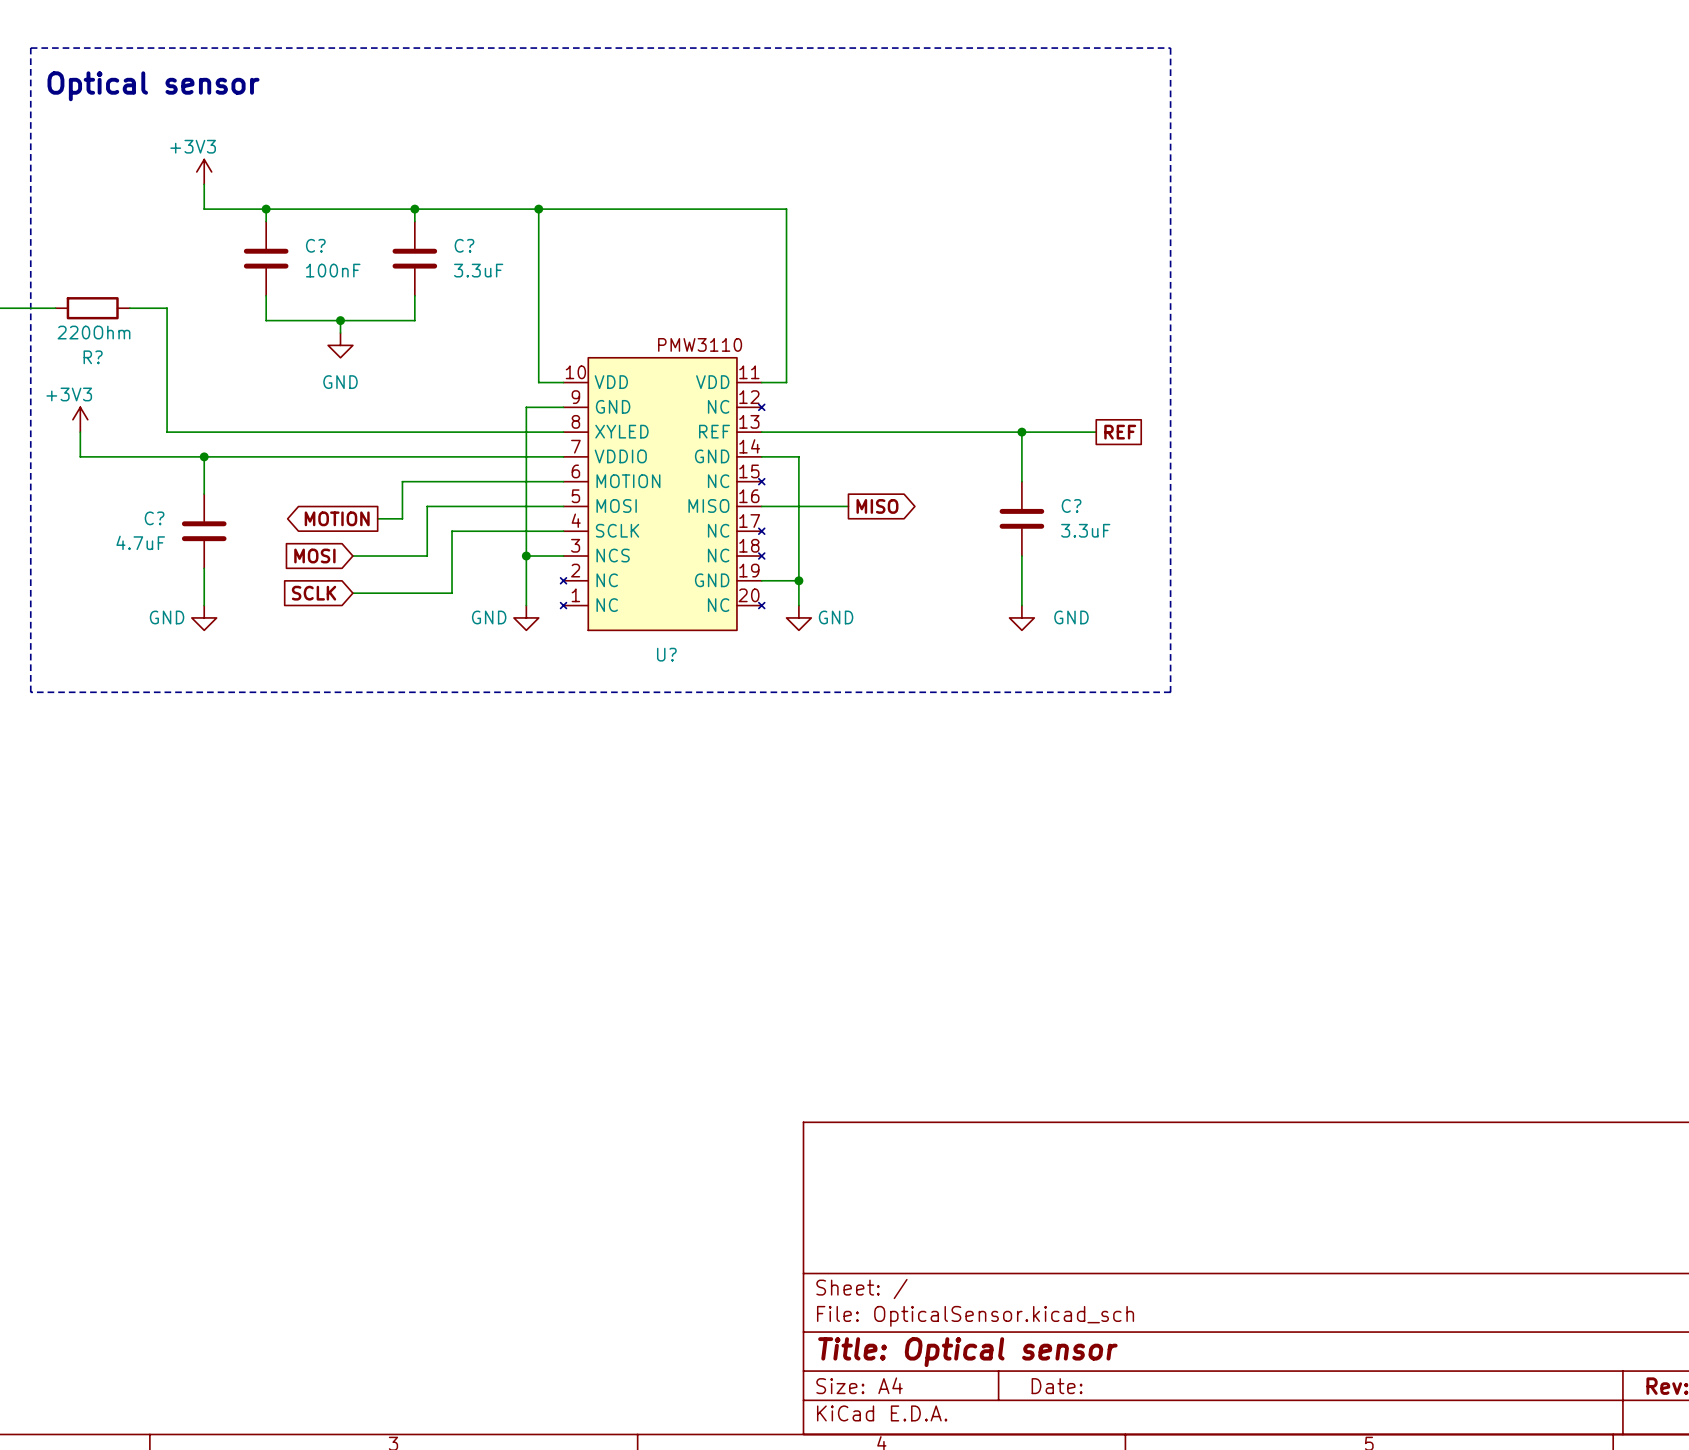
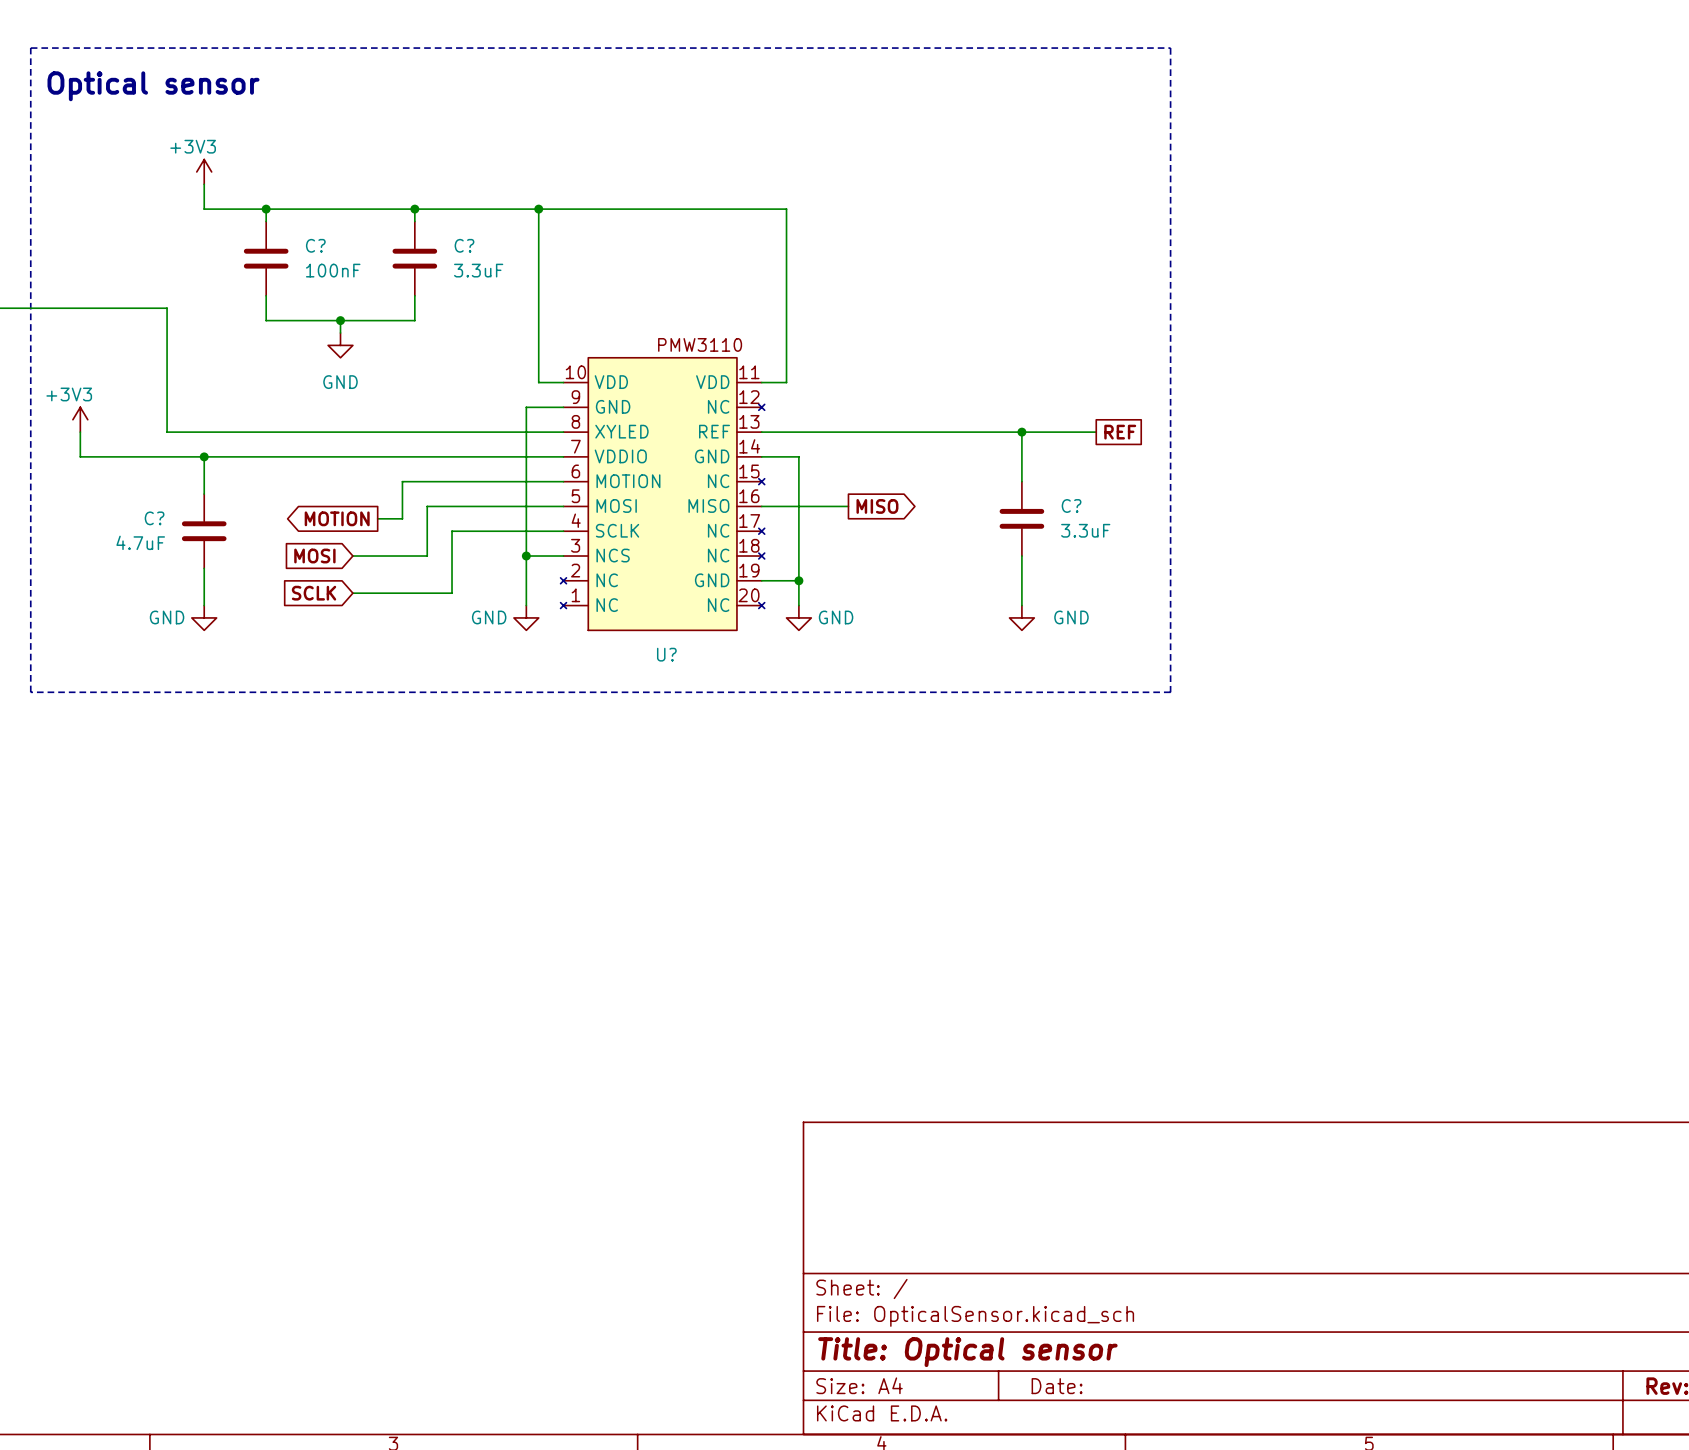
wire: none -> (55, 308) (129, 308)
R?: 220Ohm (92, 308) -> none

